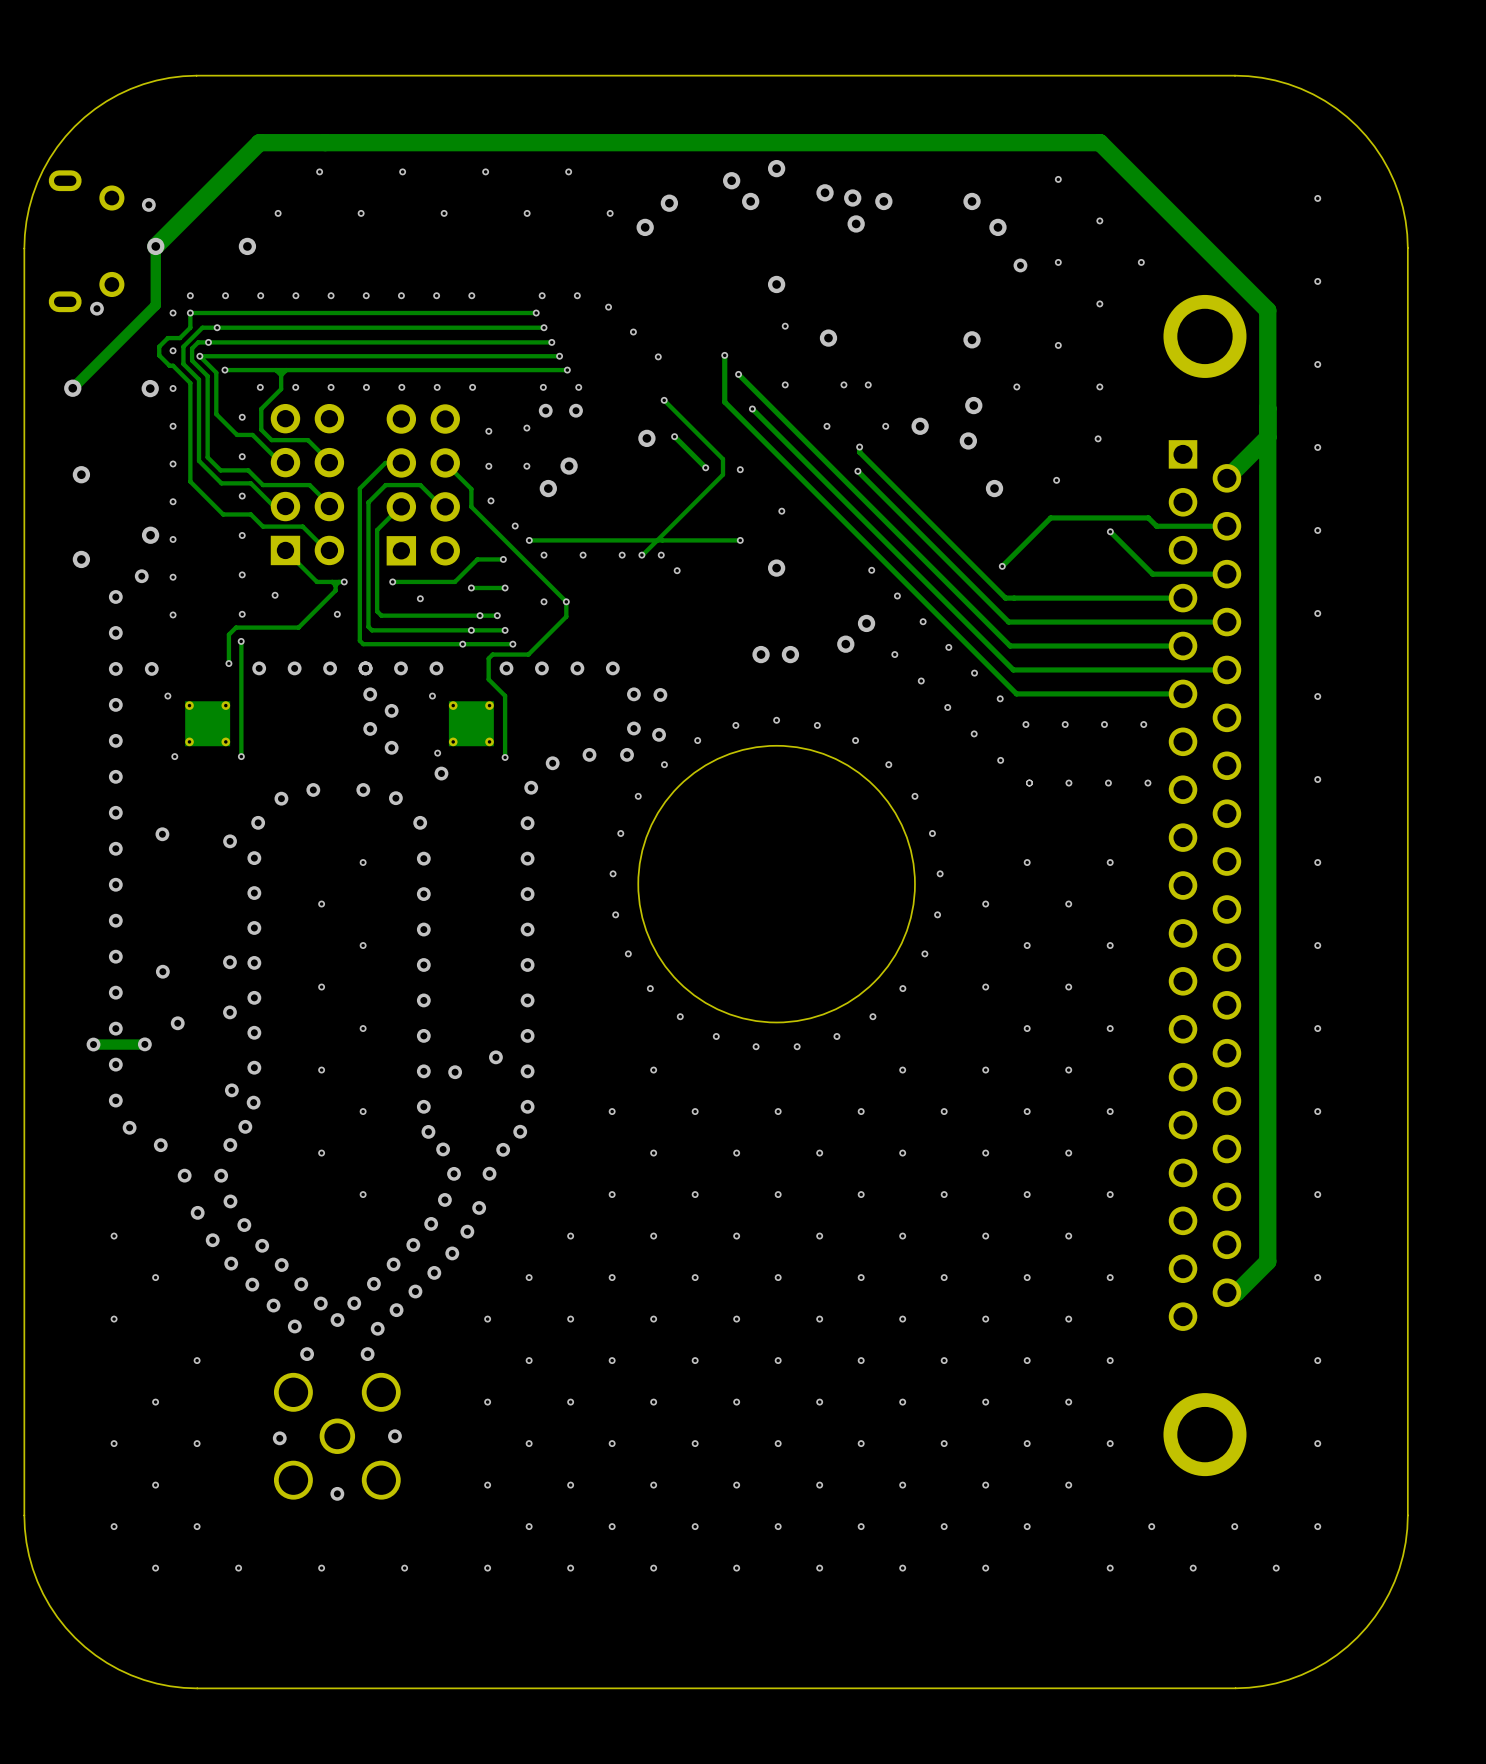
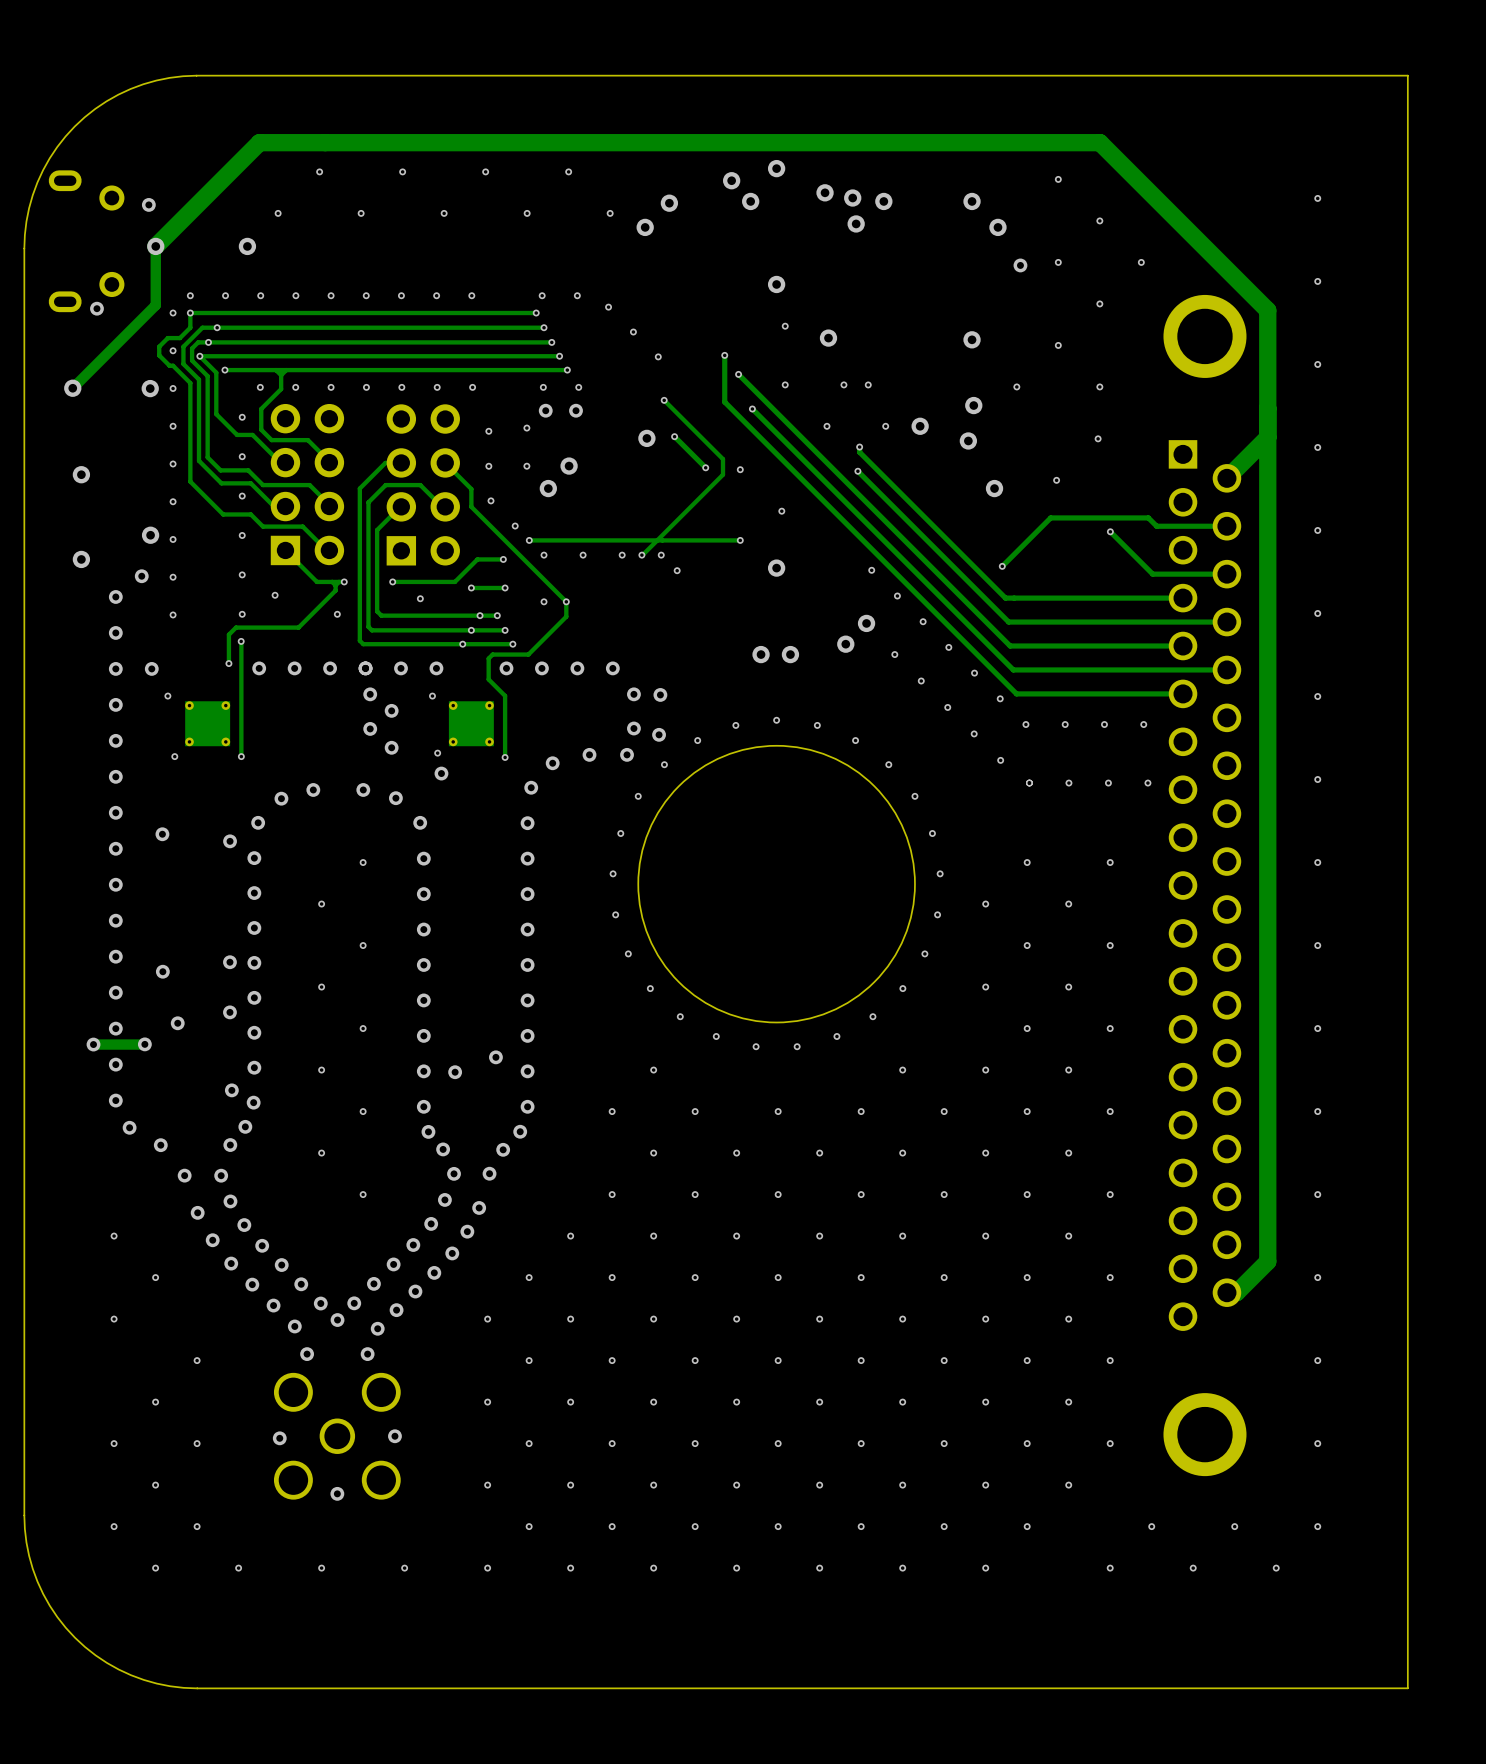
board edge: (1234, 75) (1261, 77) (1300, 88) (1325, 101) (1357, 126) (1382, 157) (1394, 181) (1405, 220) (1407, 247) -> (1234, 75) (1407, 75) (1407, 247)
board edge: (1407, 1515) (1403, 1555) (1394, 1581) (1374, 1616) (1357, 1637) (1336, 1655) (1301, 1674) (1262, 1686) (1235, 1688) -> (1407, 1515) (1407, 1688) (1235, 1688)

